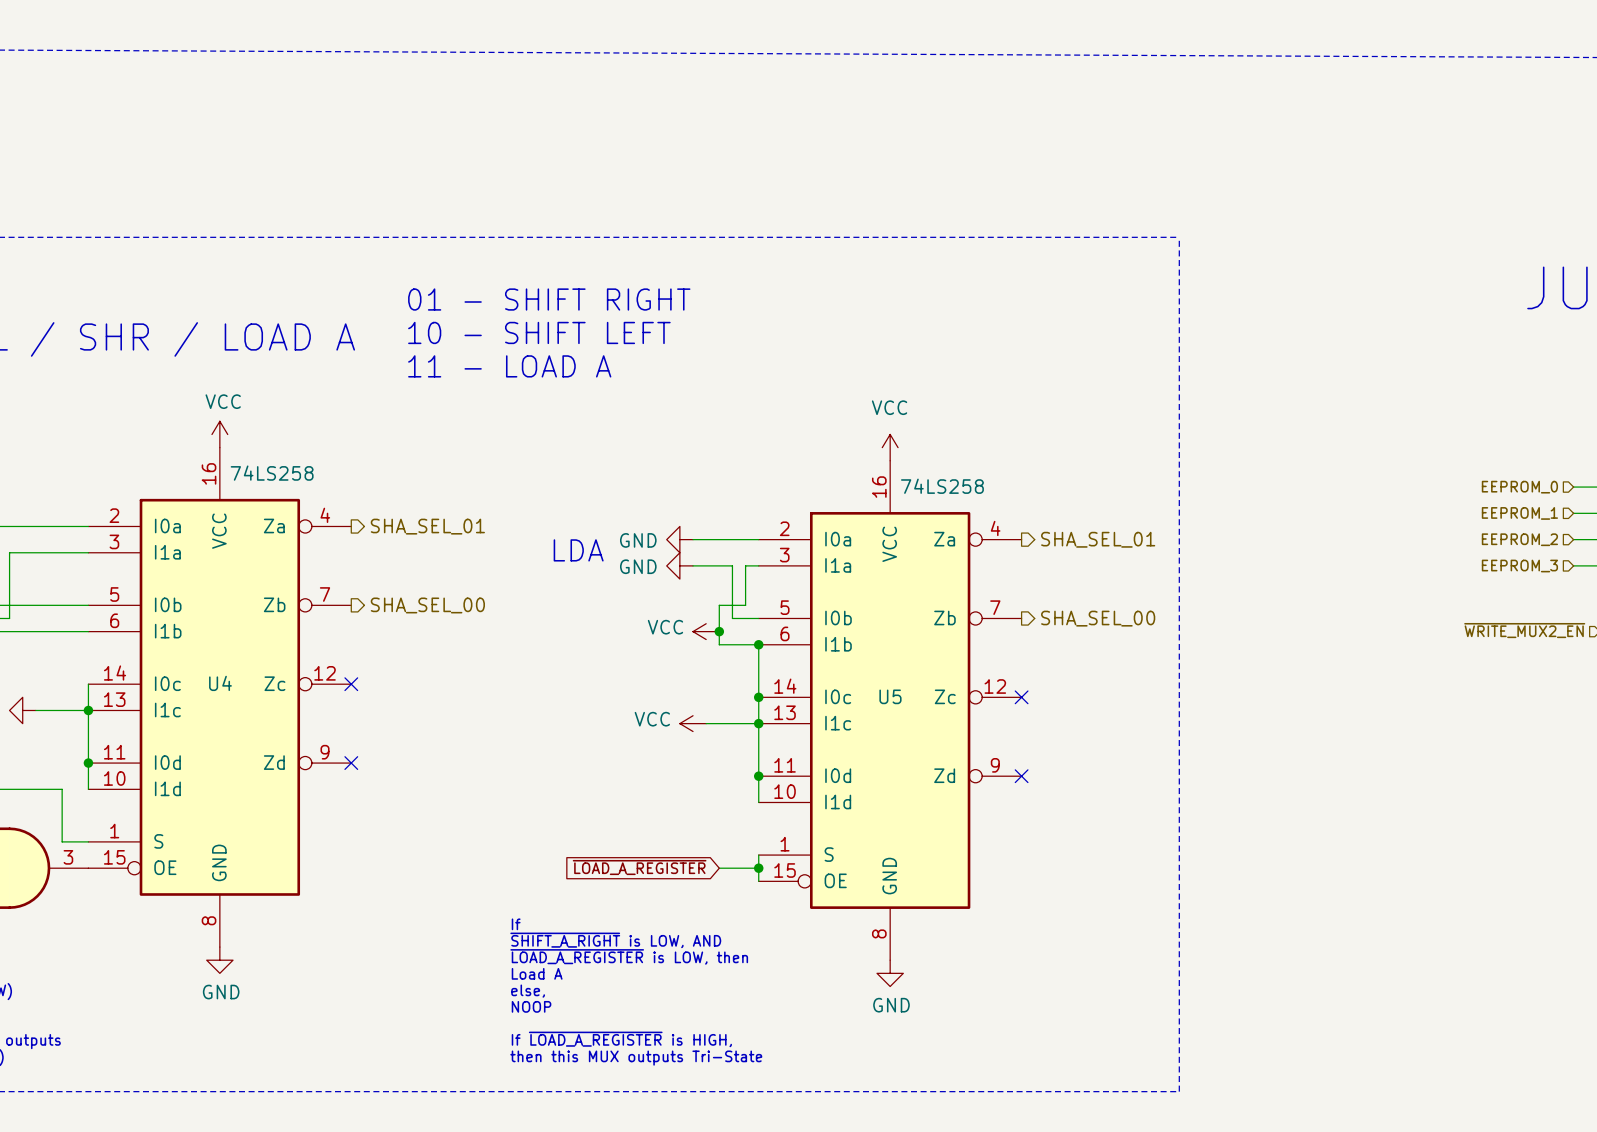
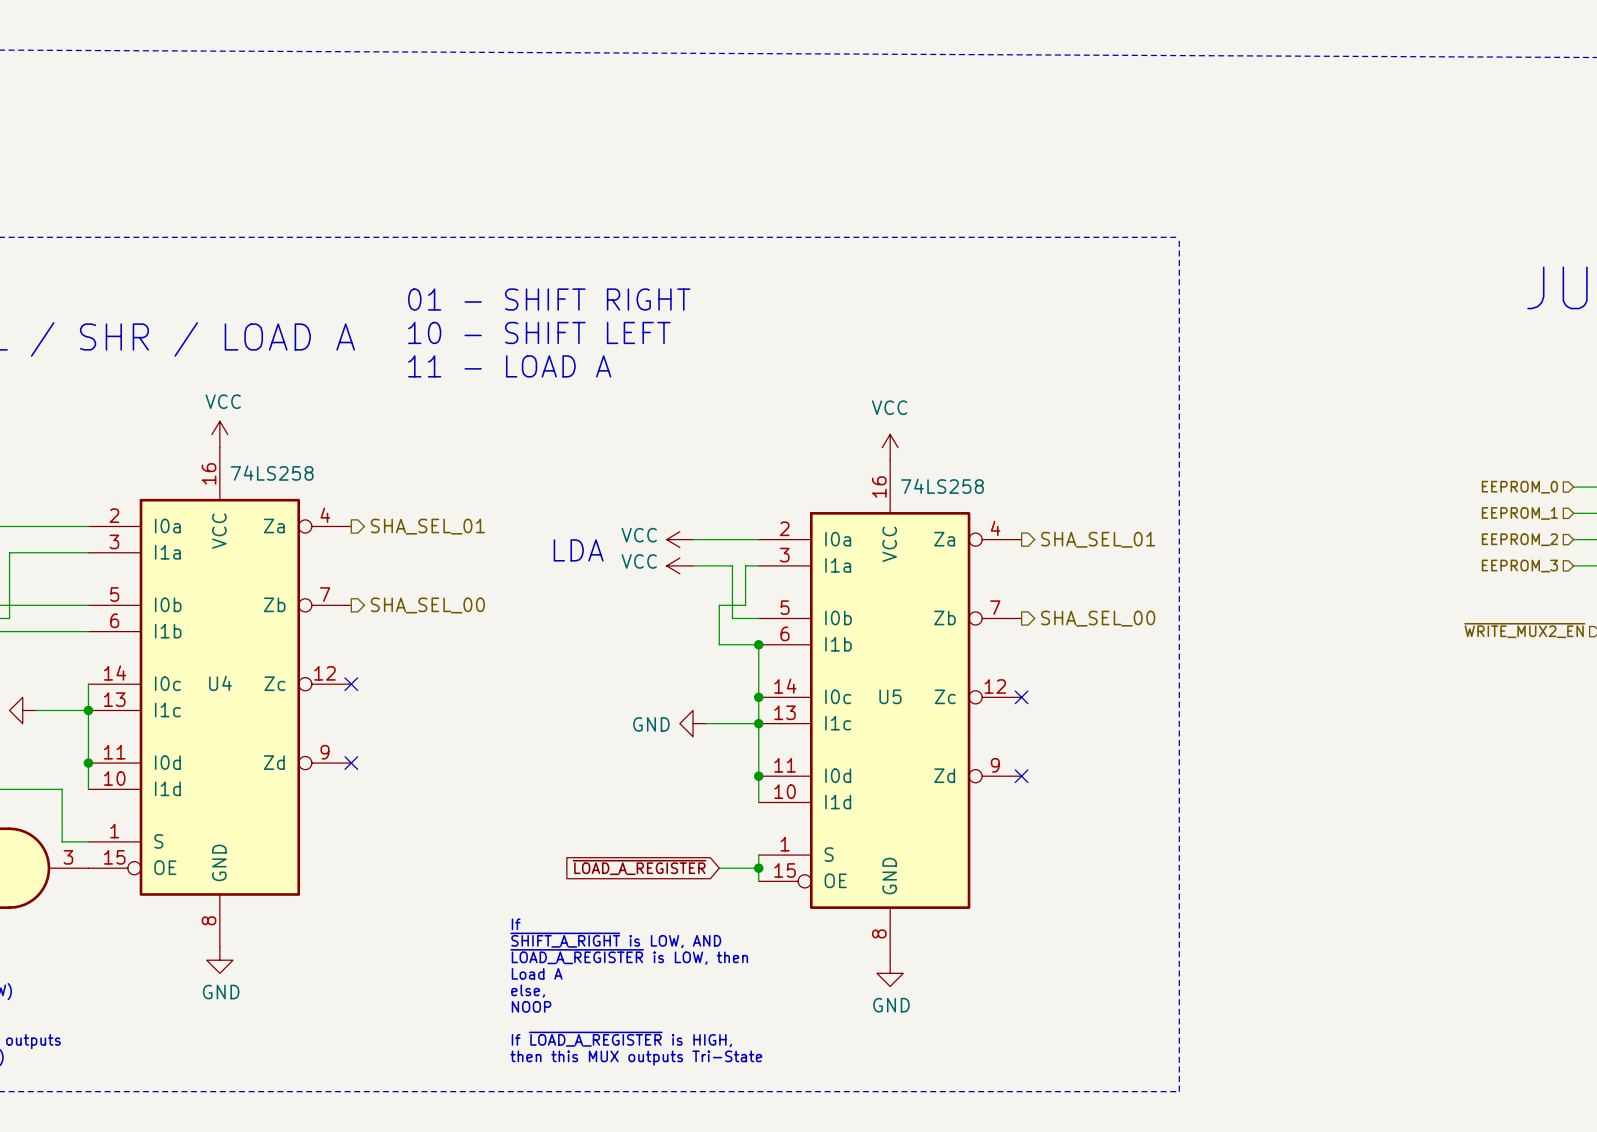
power symbol: GND (679, 539) -> VCC (679, 539)
power symbol: GND (679, 565) -> VCC (679, 565)
power symbol: VCC (706, 631) -> none
junction: (719, 631) -> none
power symbol: VCC (693, 723) -> GND (693, 723)

